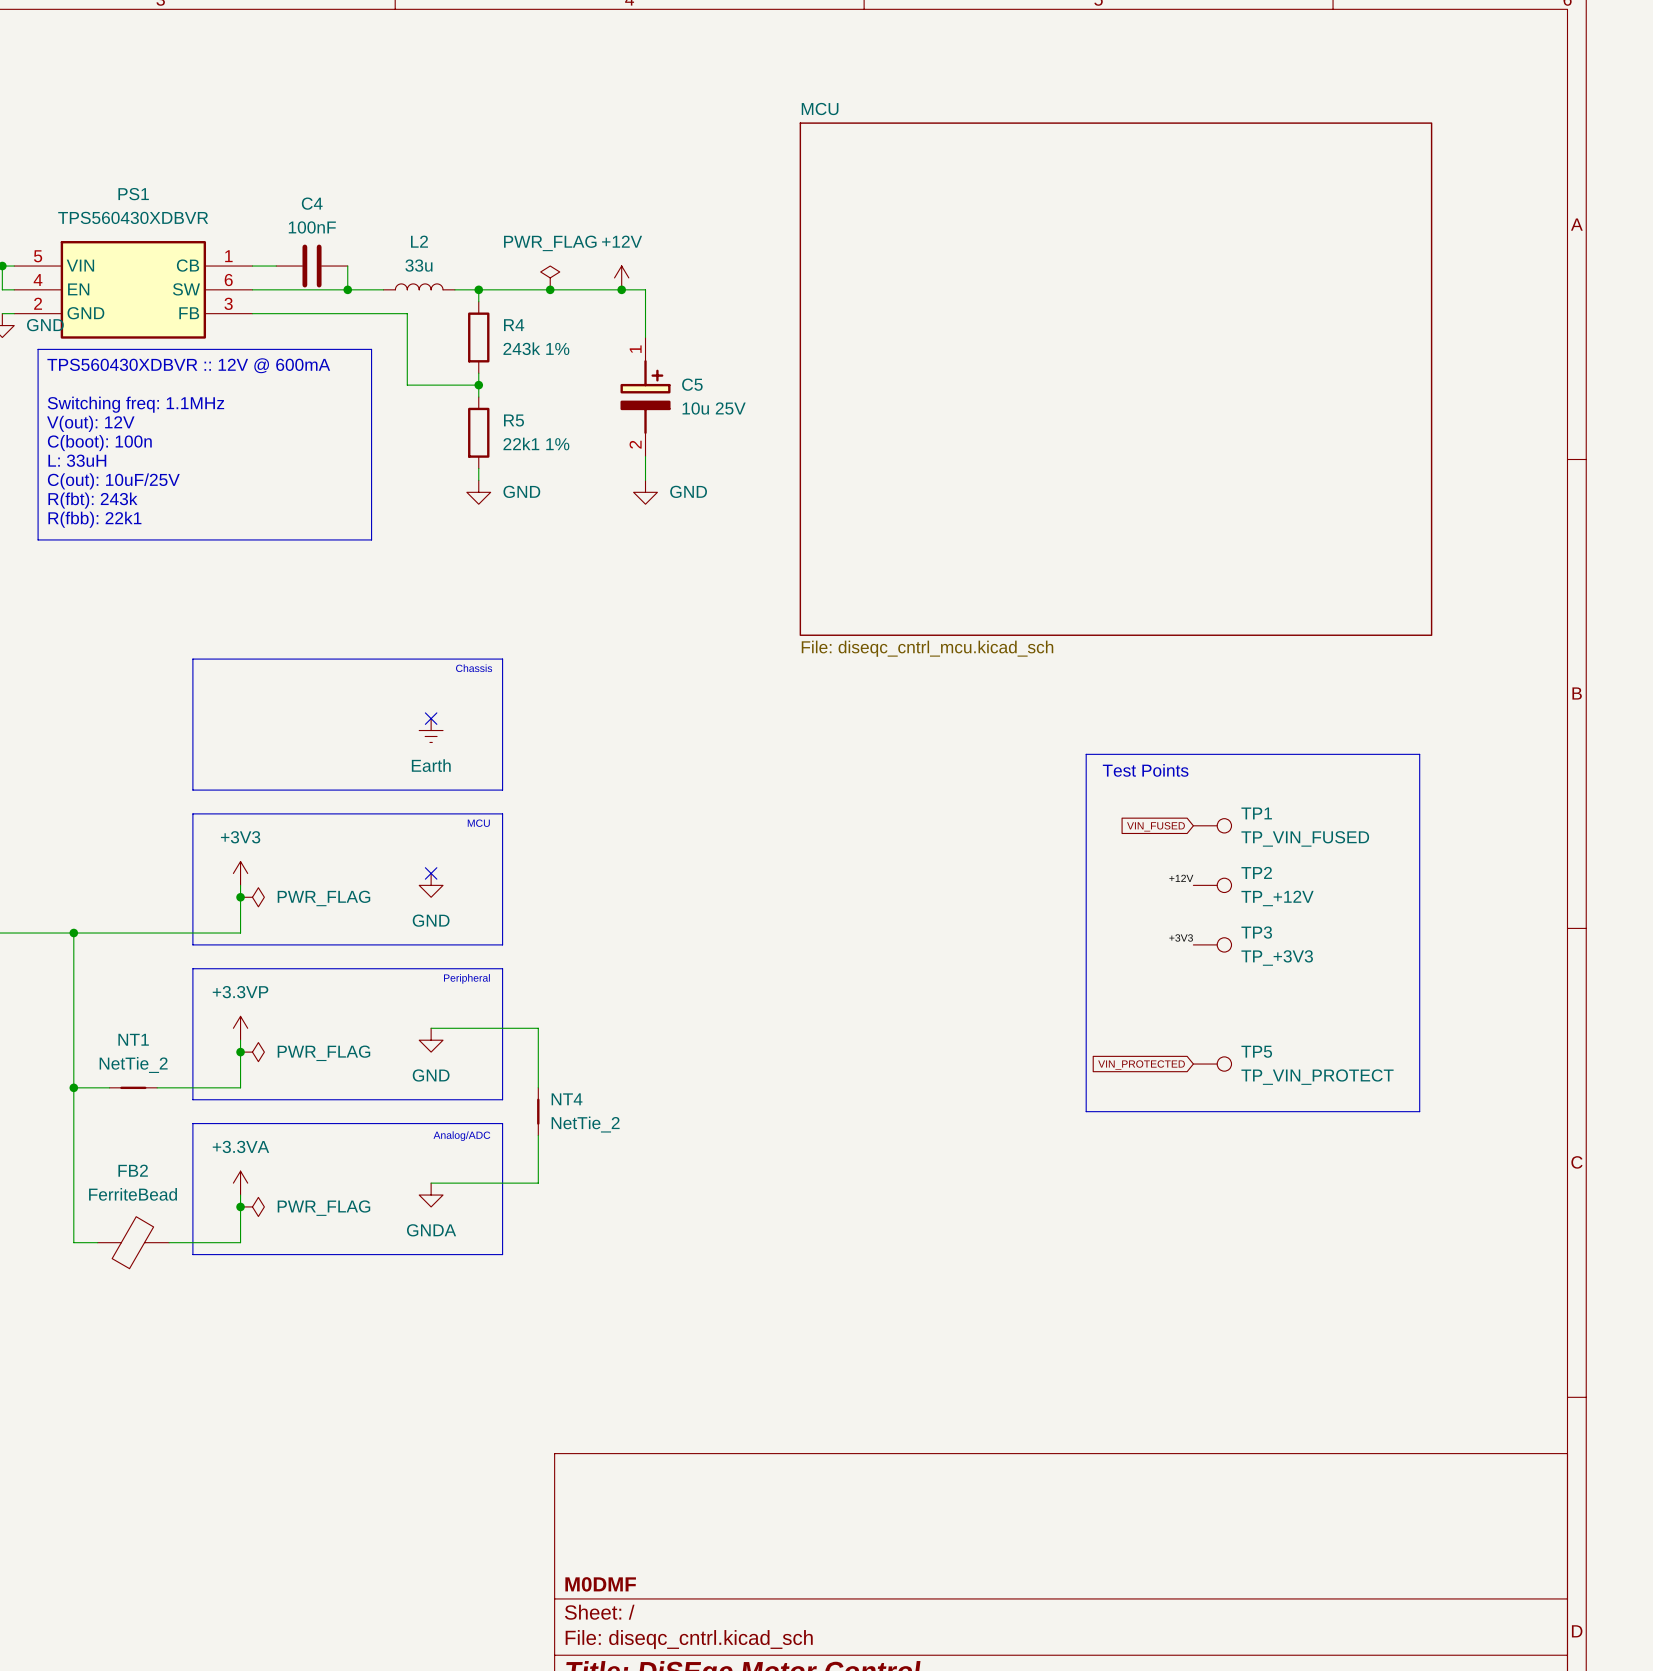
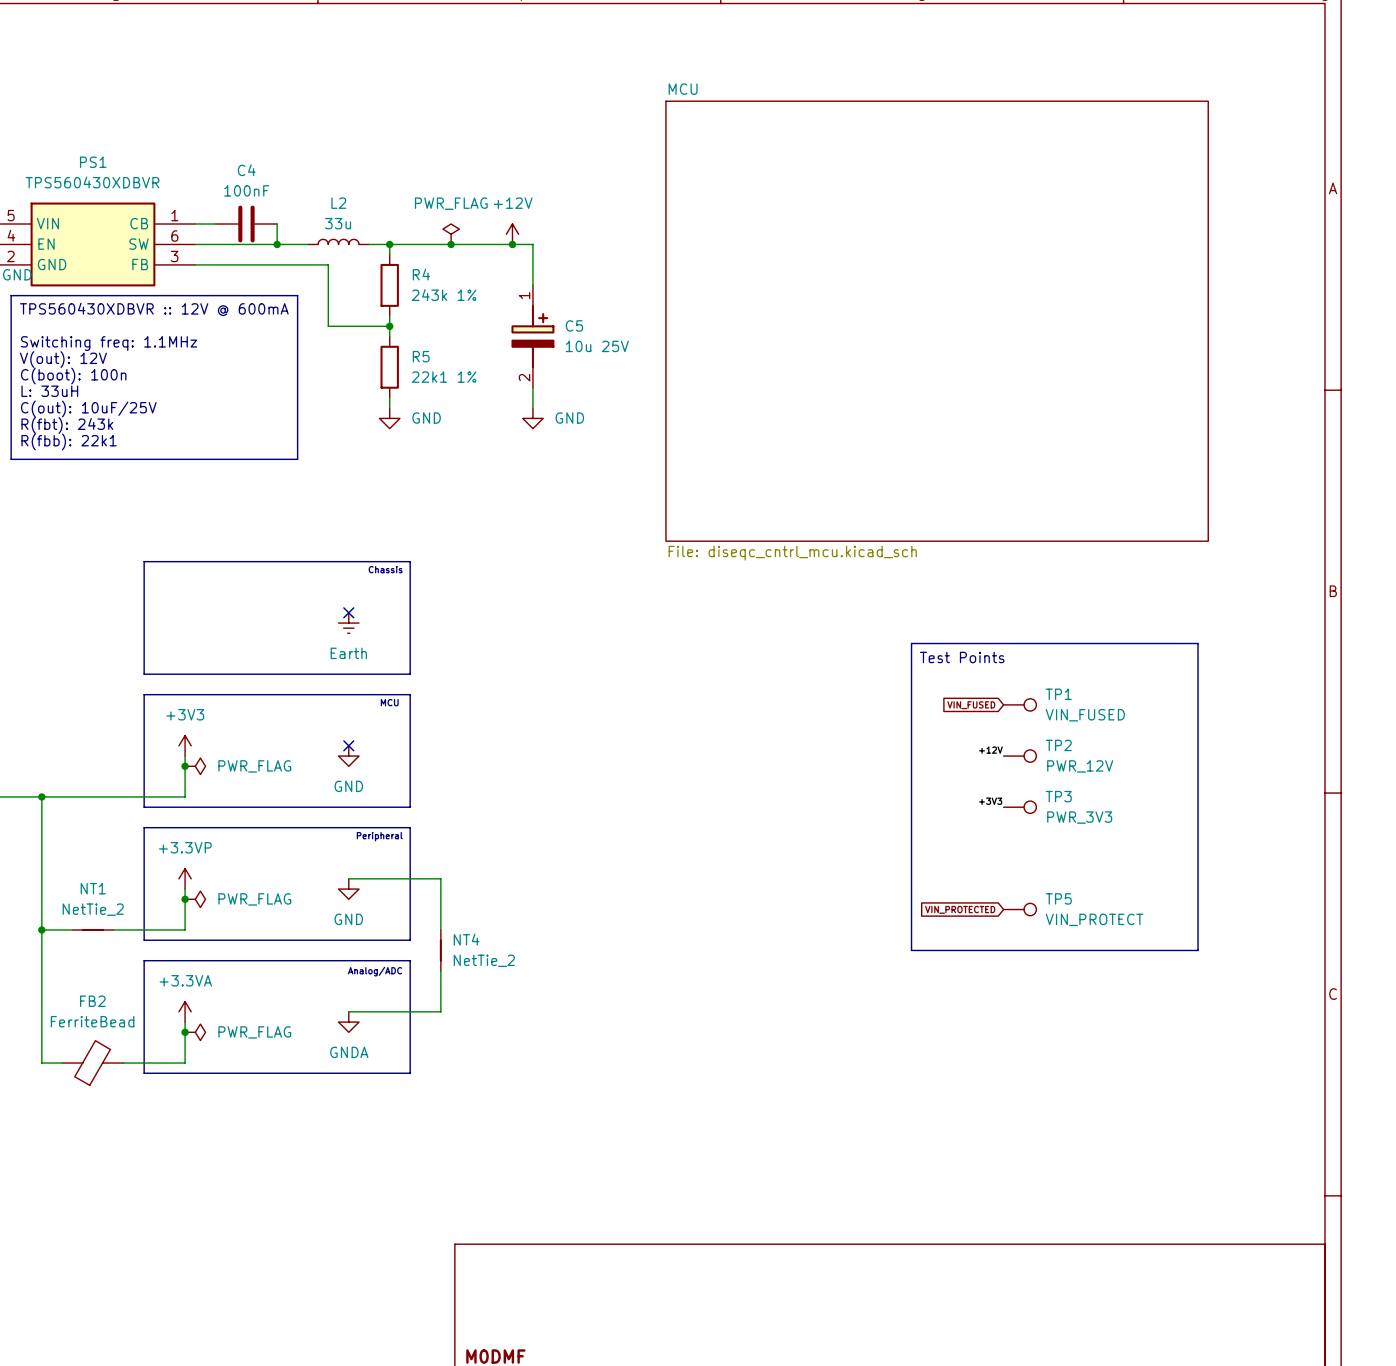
TP1 value: TP_VIN_FUSED (1305, 838) -> VIN_FUSED (1085, 715)
TP2 value: TP_+12V (1277, 898) -> PWR_12V (1080, 766)
TP3 value: TP_+3V3 (1277, 958) -> PWR_3V3 (1079, 817)
TP5 value: TP_VIN_PROTECT (1317, 1077) -> VIN_PROTECT (1094, 919)

